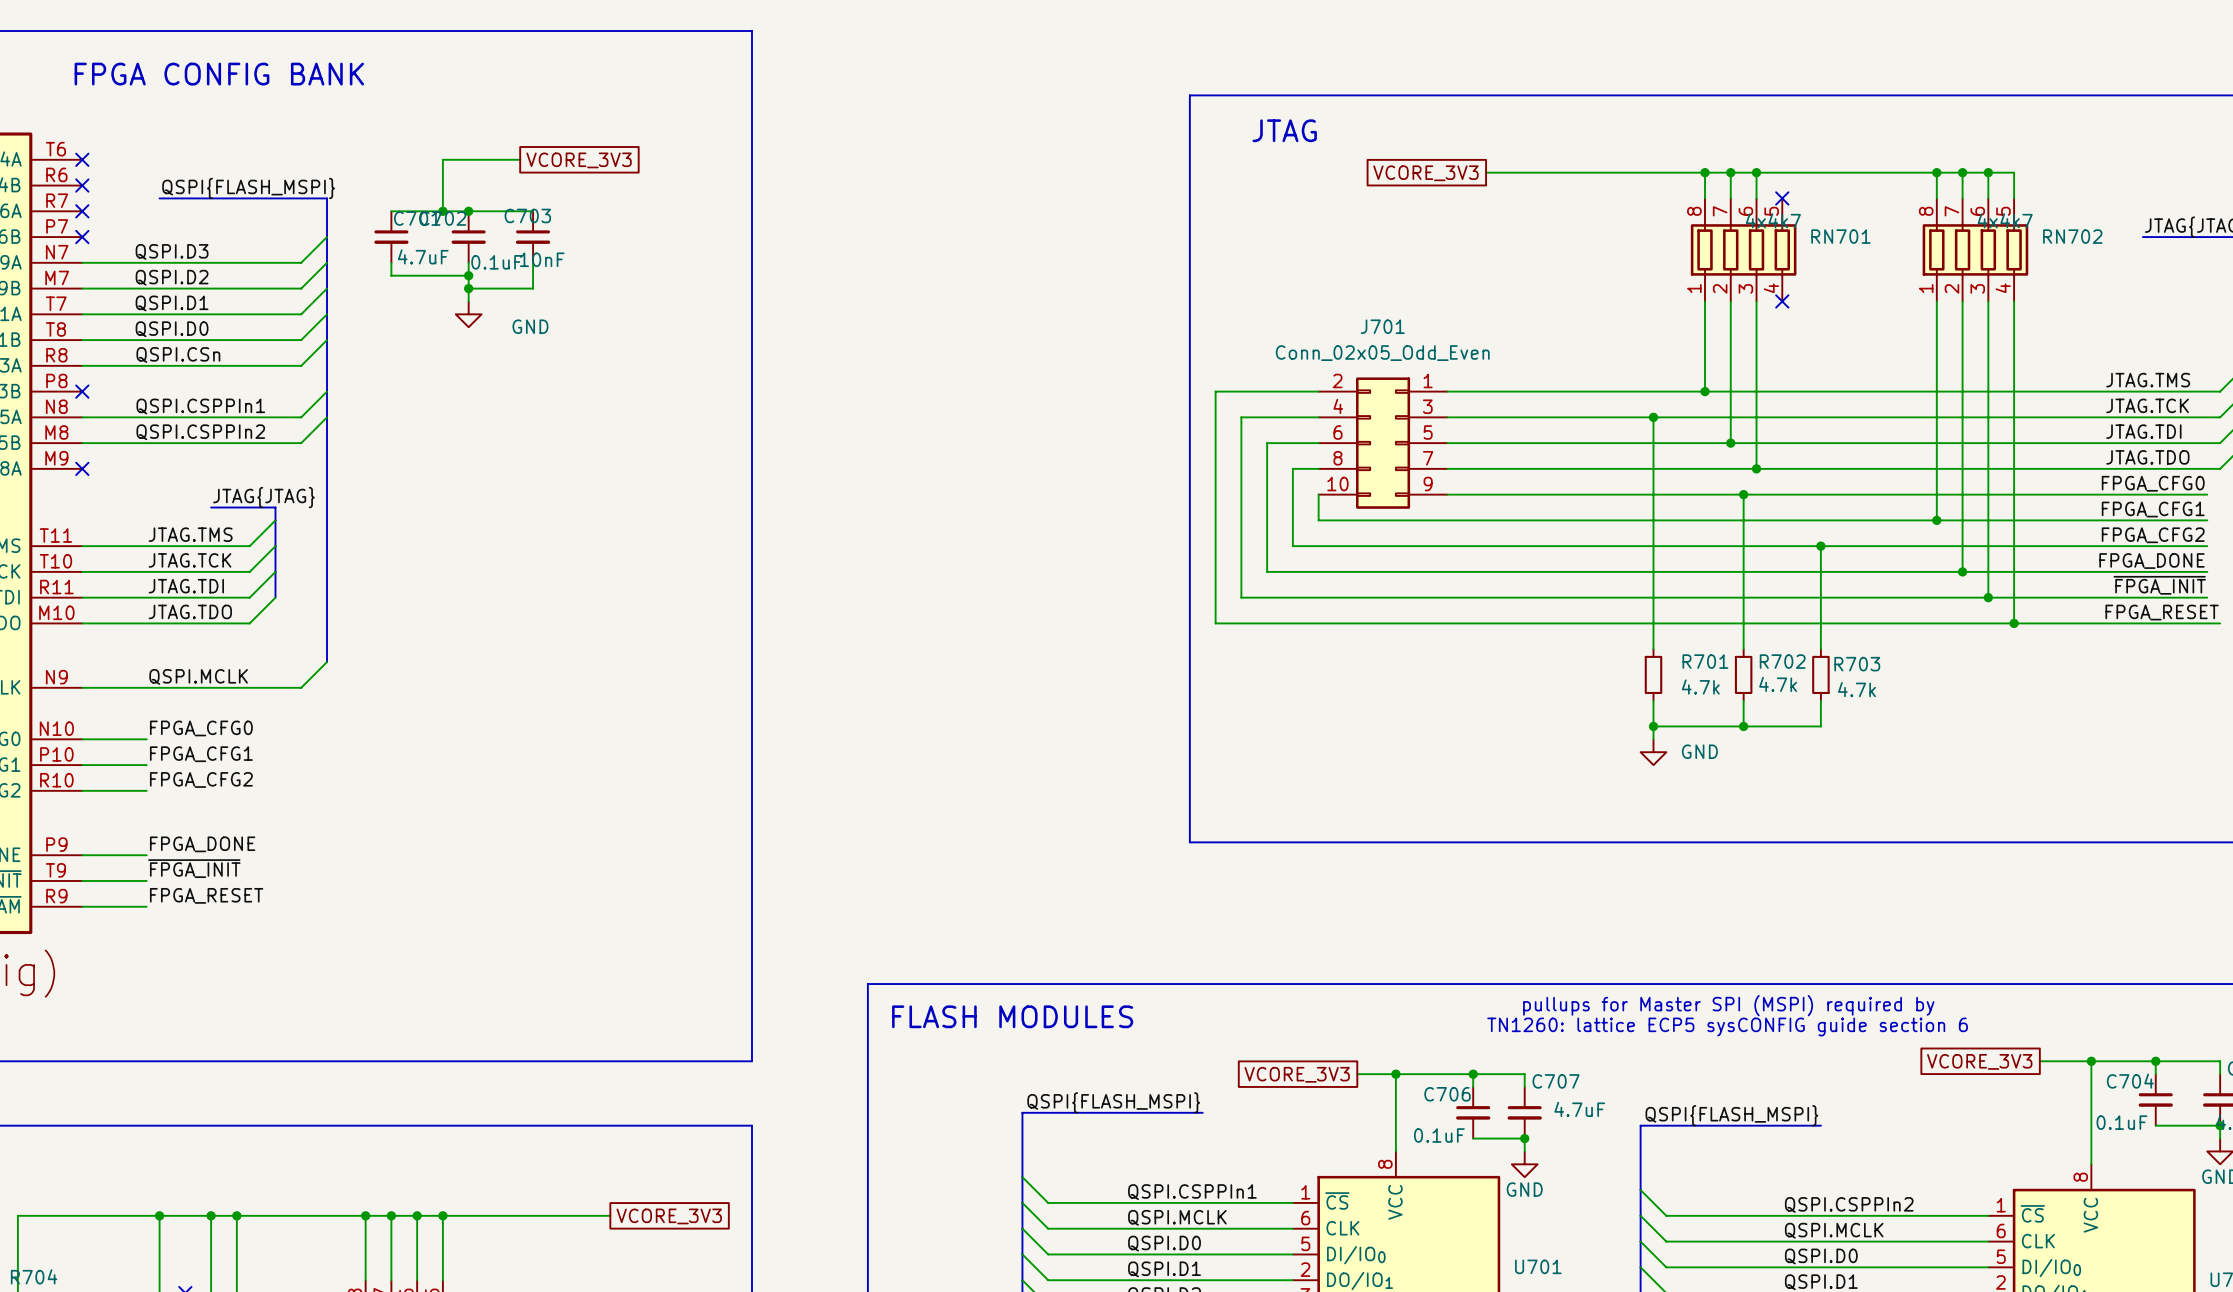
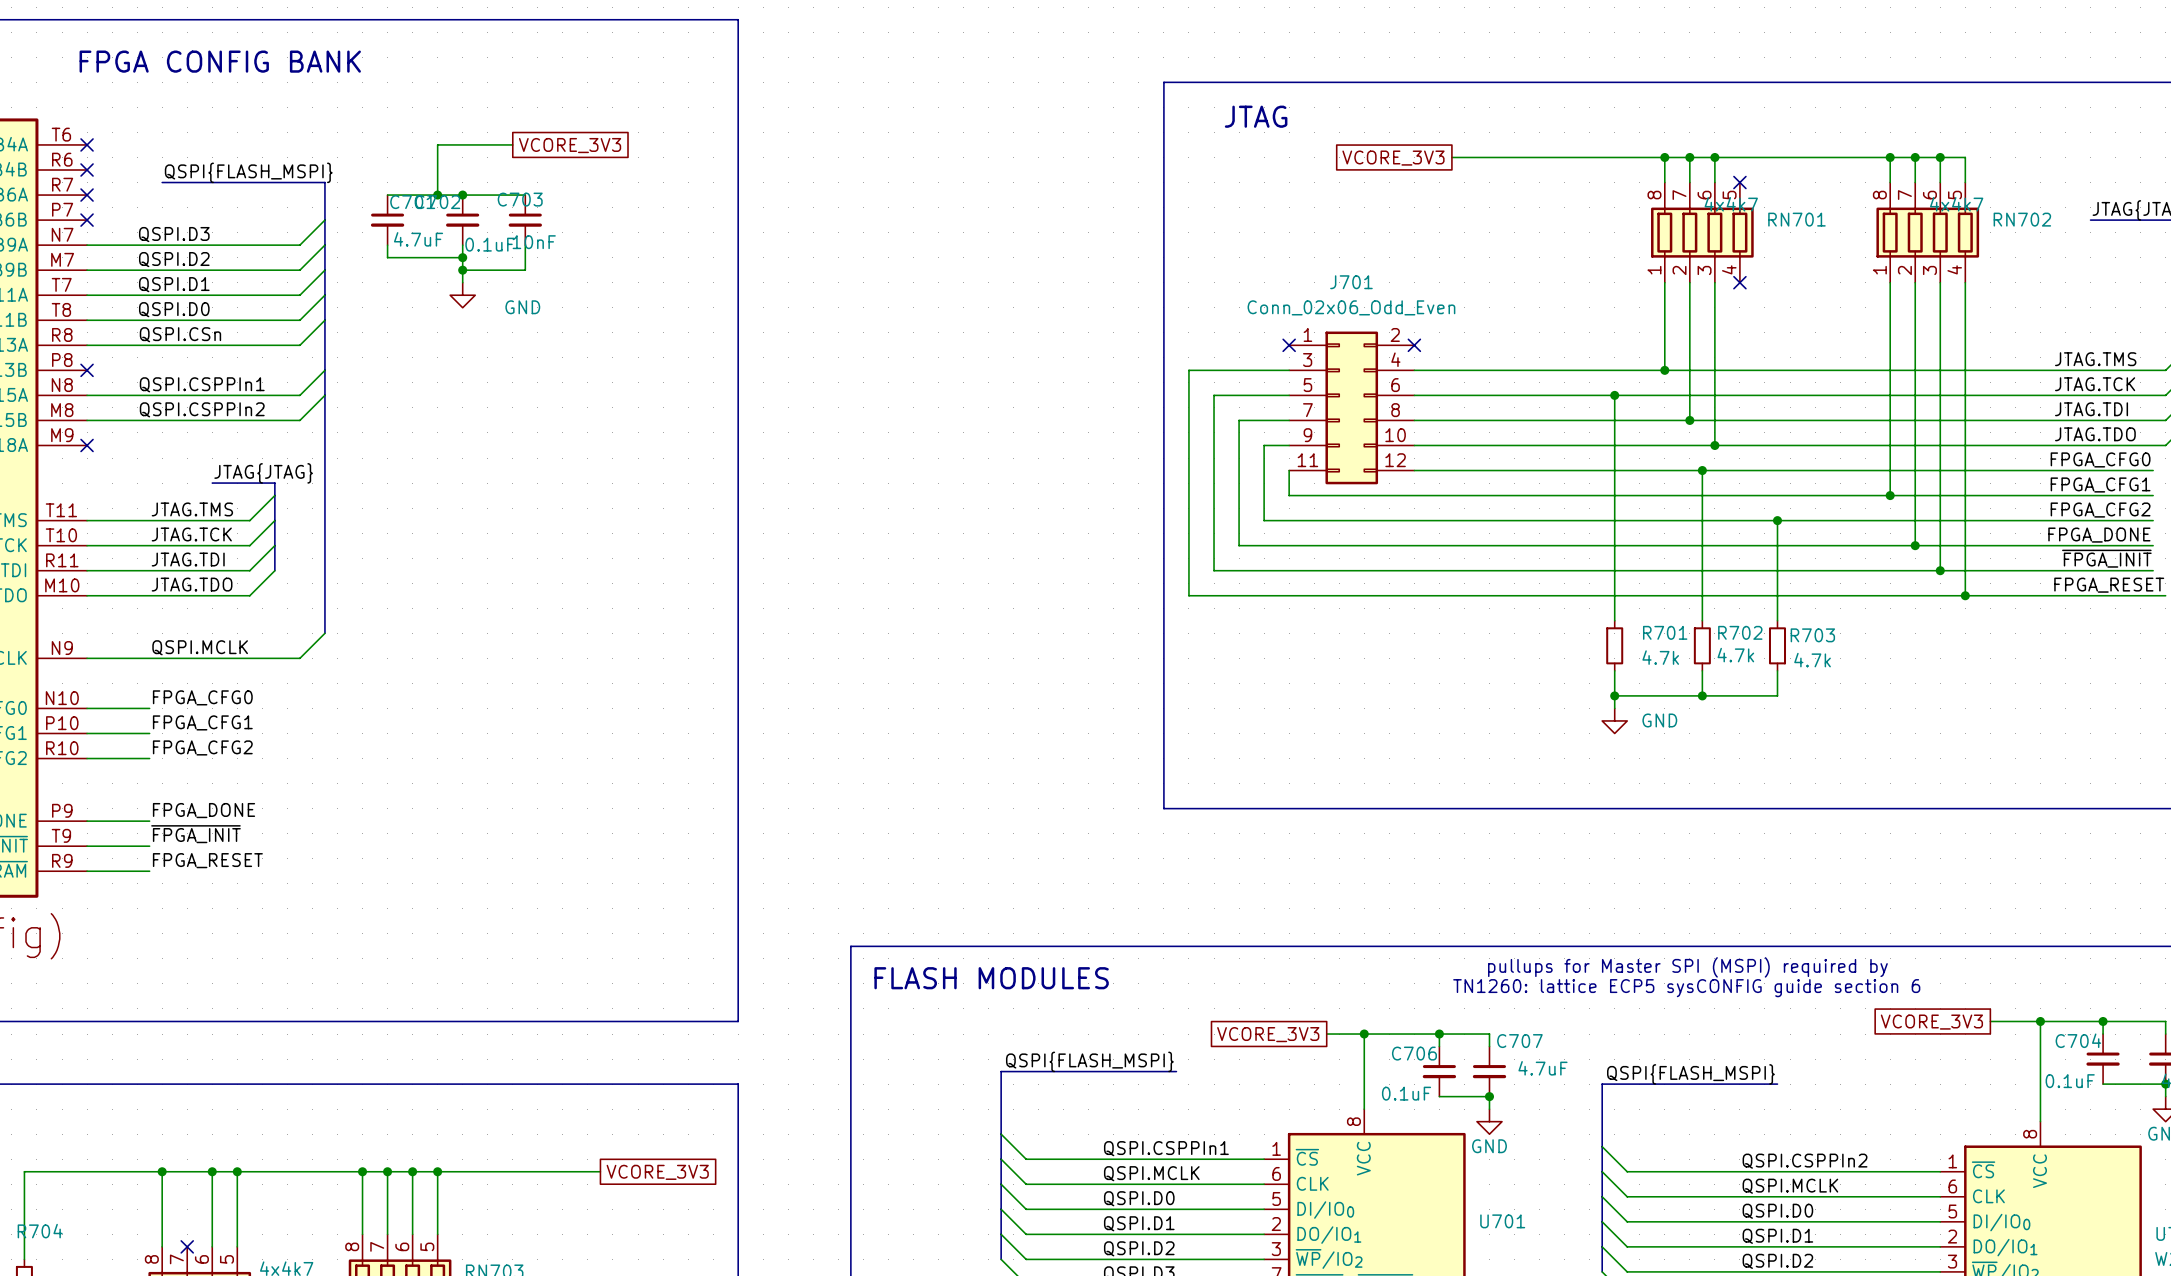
J701 value: Conn_02x05_Odd_Even (1382, 353) -> Conn_02x06_Odd_Even (1351, 307)
no-connect mark: none -> (1289, 345)
no-connect mark: none -> (1414, 345)
J701 symbol: [1318, 377, 1448, 509] -> [1289, 331, 1415, 485]

